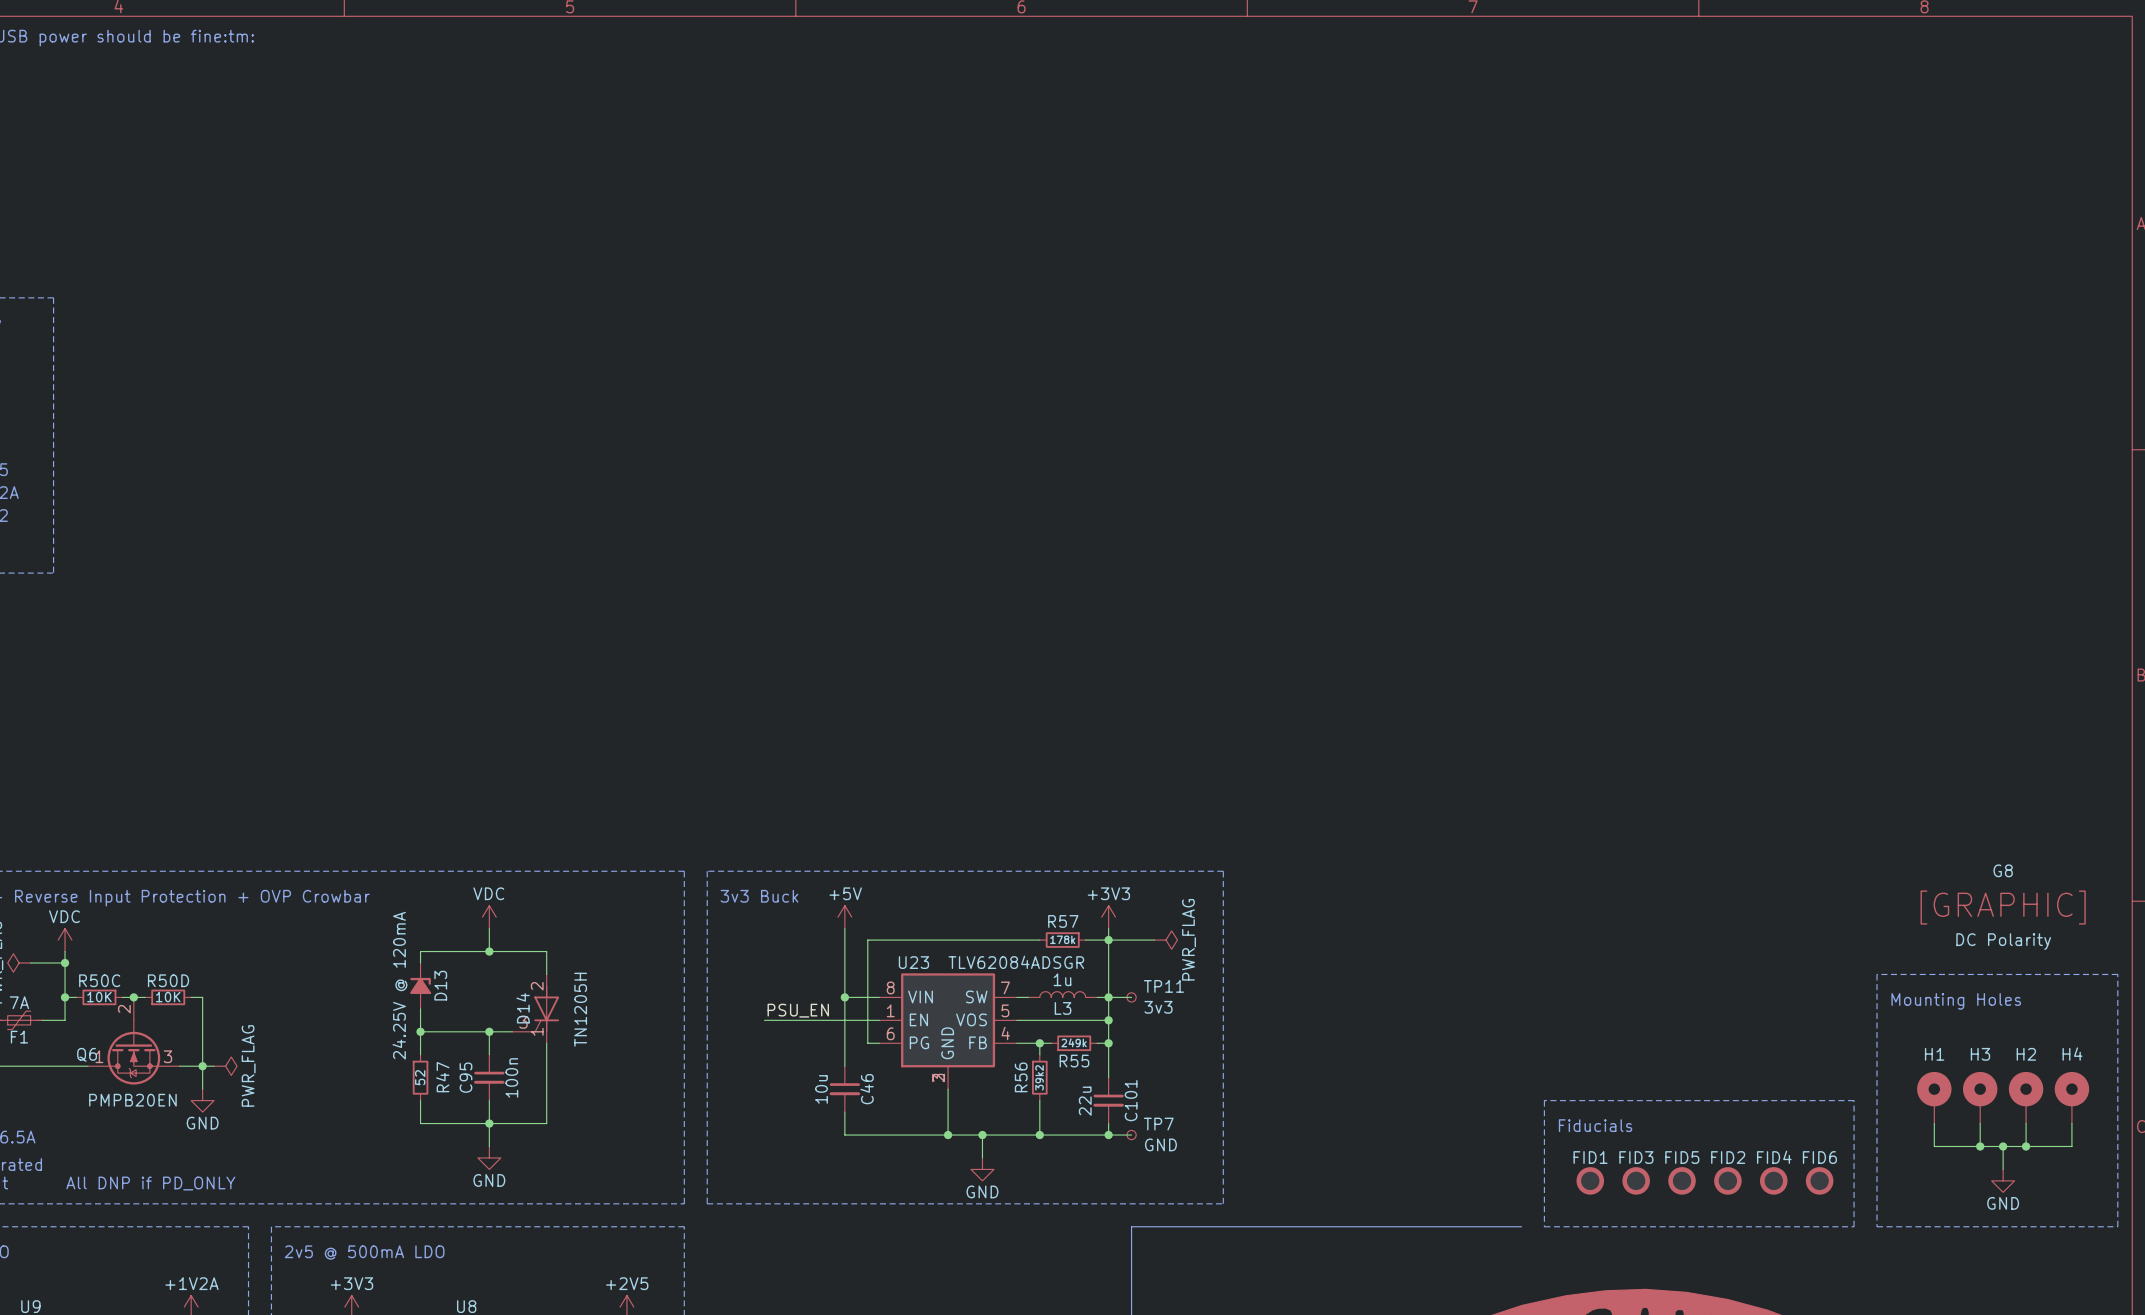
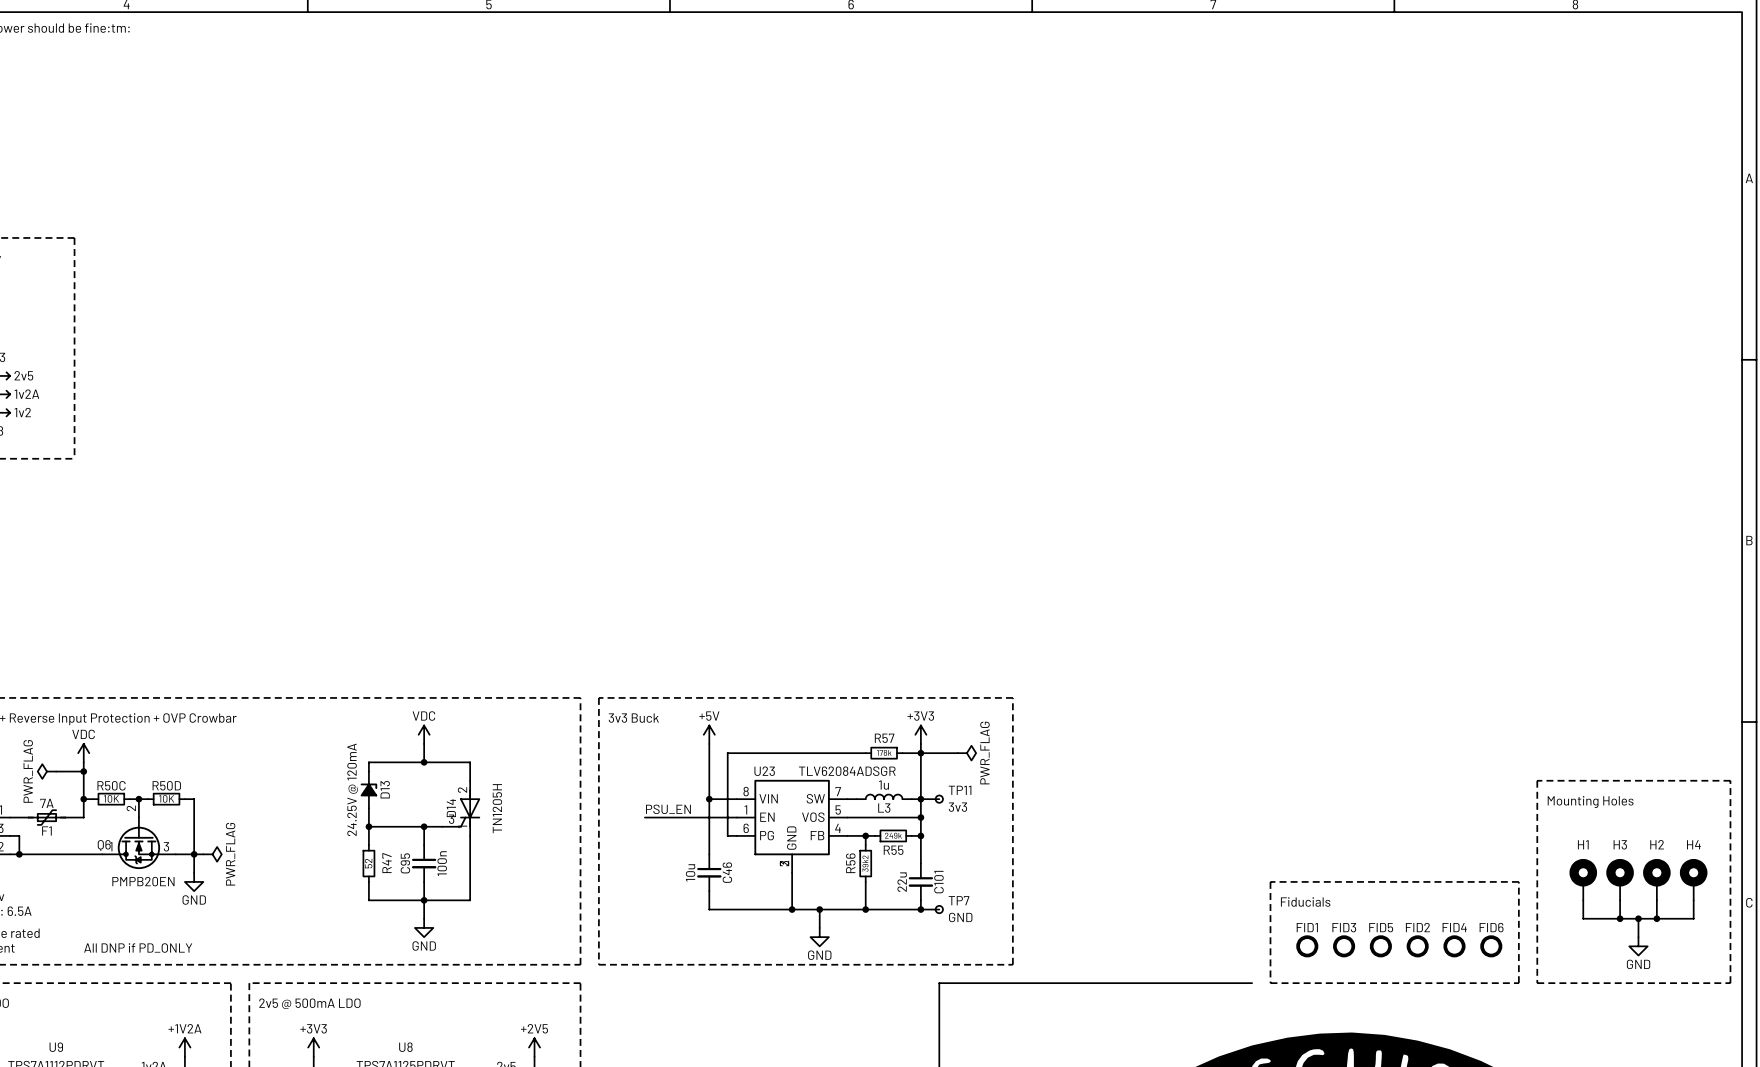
G8: DC Polarity (2003, 907) -> none

